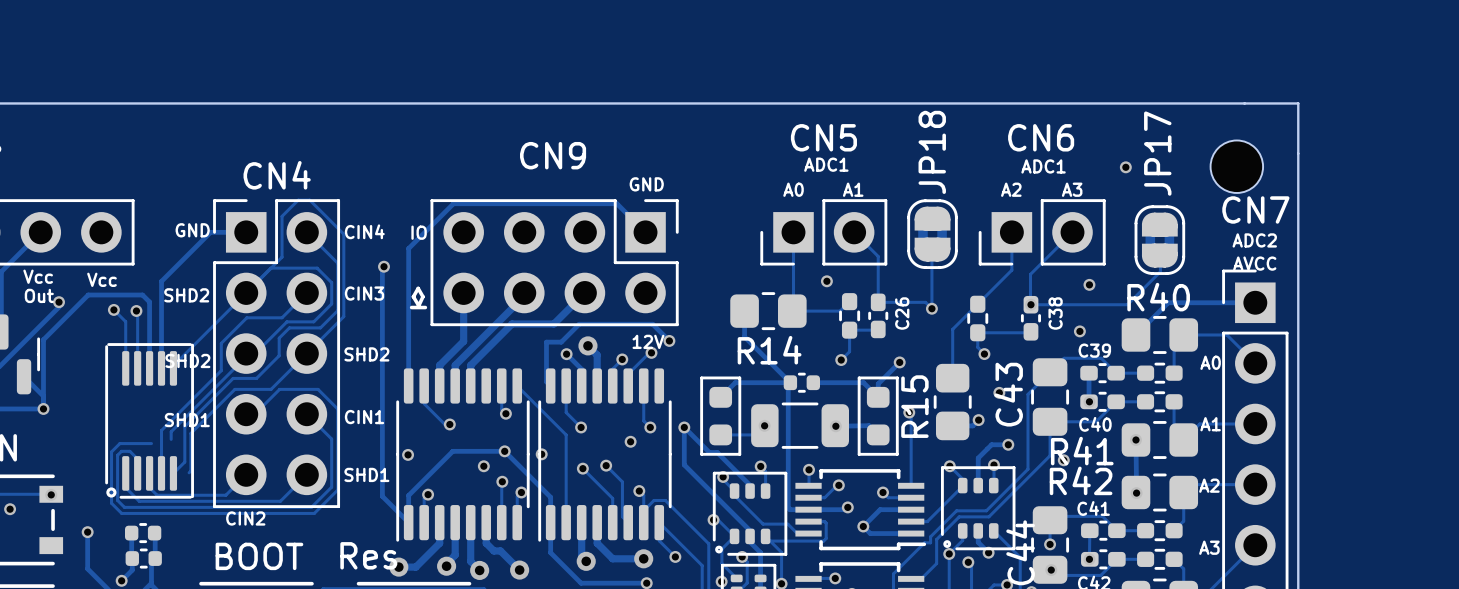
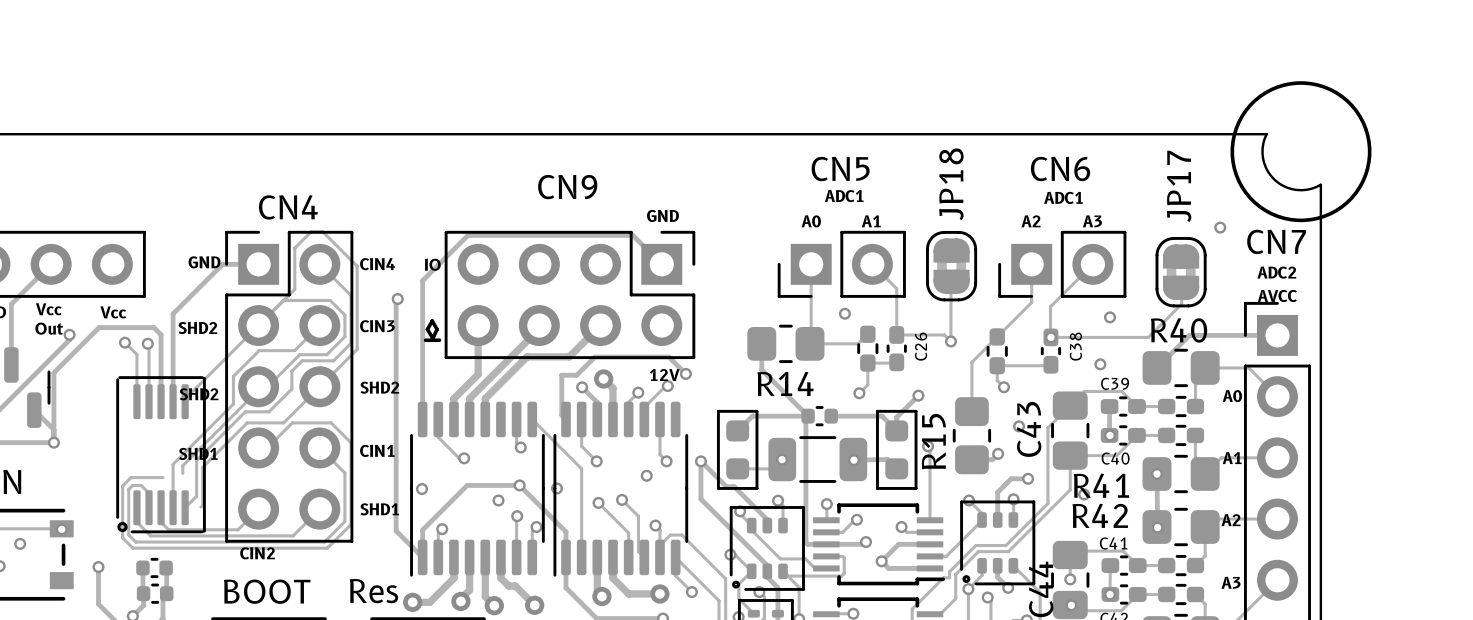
drawing: none -> [1230, 81, 1372, 223]
board edge: (1244, 103) (1298, 103) (1298, 153) -> (1266, 134) (1263, 143) (1263, 158) (1268, 172) (1274, 179) (1287, 187) (1296, 190) (1306, 189) (1320, 184)
part: (1236, 166) -> none
via position: (1125, 167) -> (1220, 227)

